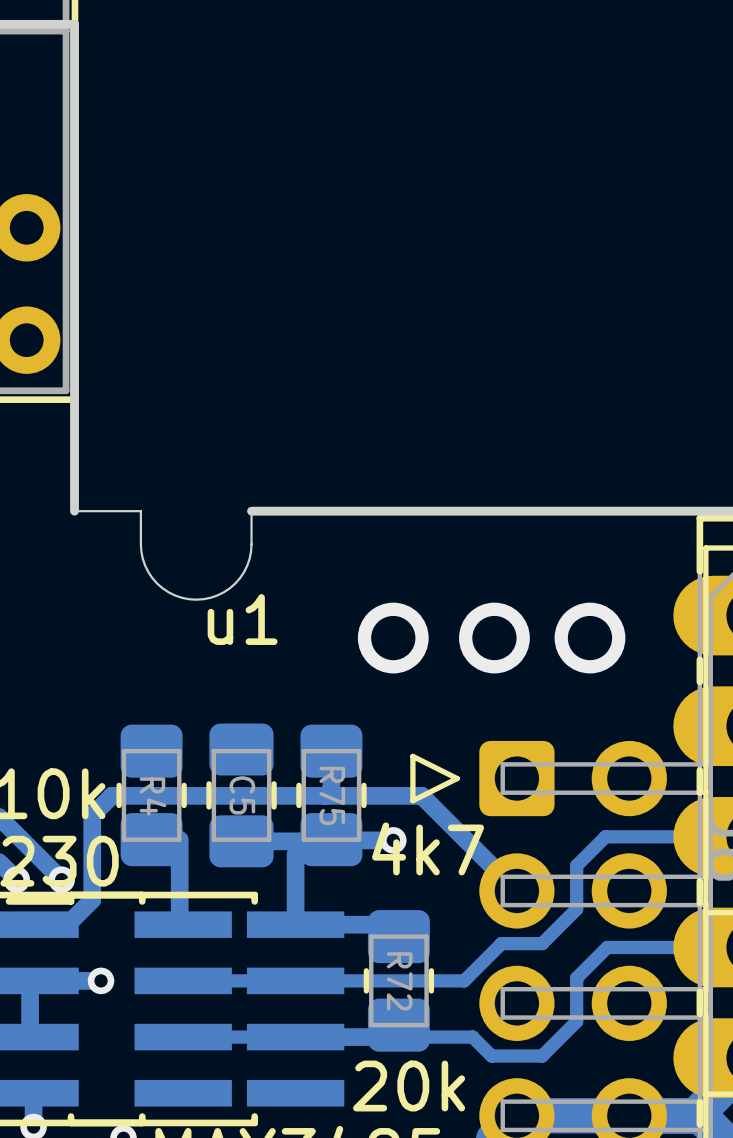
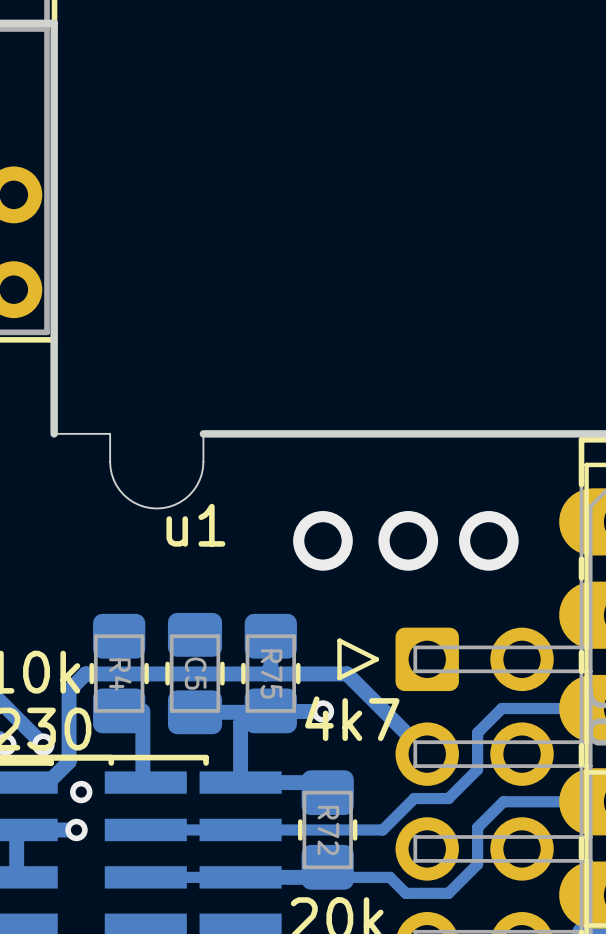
via: none -> (81, 792)

